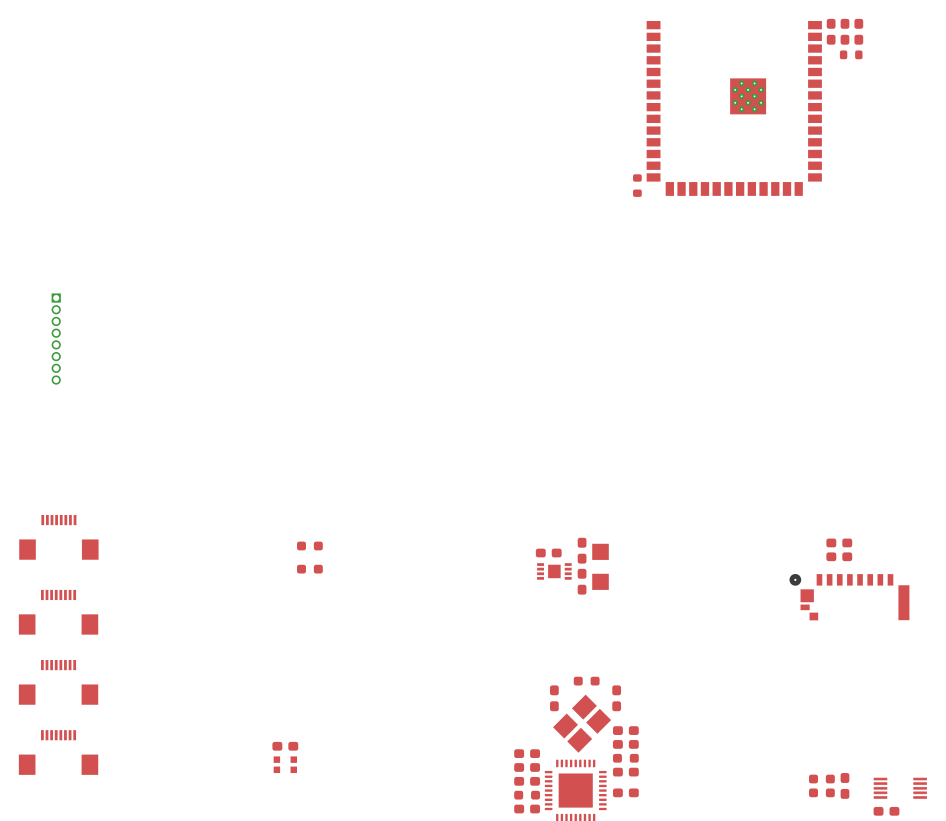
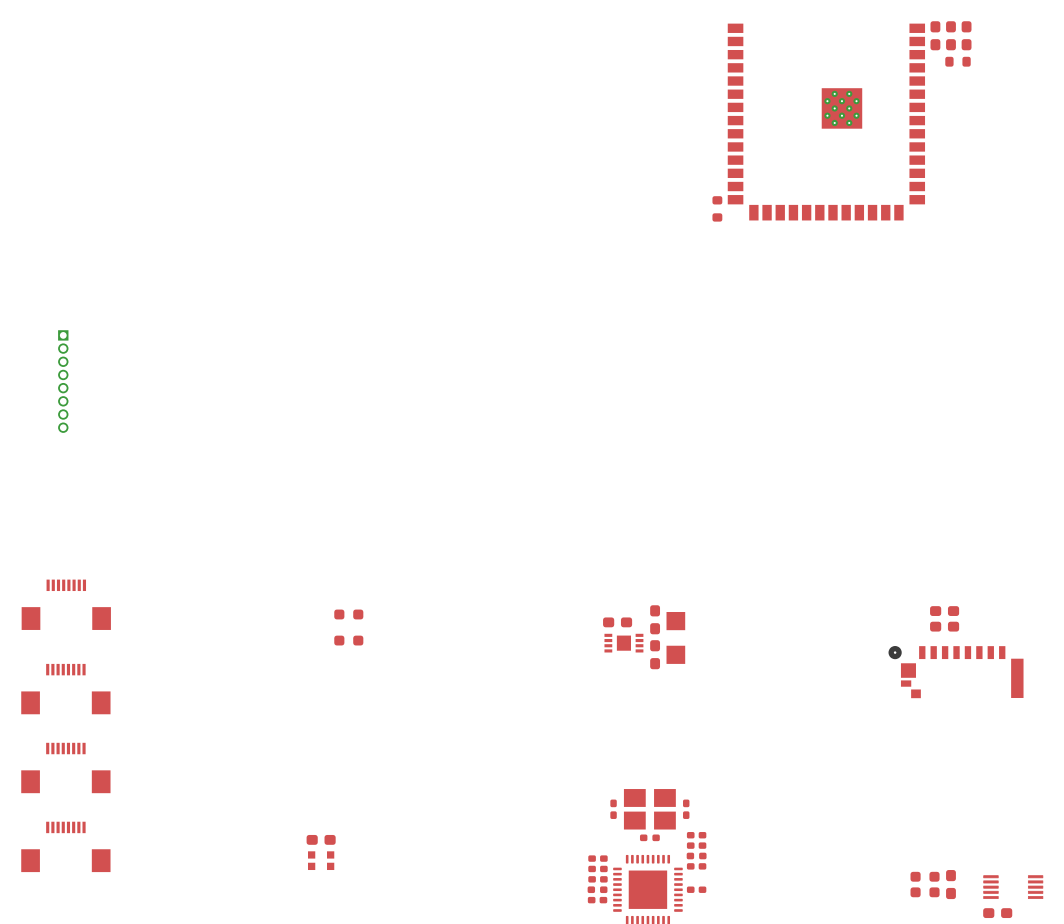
part: (586, 681) -> none
part: (554, 698) -> none
part: (616, 698) -> none
part: none -> (613, 809)
part: none -> (686, 809)
part rotation: 0° (582, 723) -> 45° clockwise (649, 809)
part: (625, 730) -> none
part: none -> (696, 835)
part: none -> (649, 837)
part: (625, 744) -> none
part: none -> (696, 845)
part: (527, 753) -> none
part: (625, 758) -> none
part: none -> (696, 855)
part: none -> (597, 858)
part: (527, 767) -> none
part: none -> (696, 866)
part: none -> (597, 868)
part: (625, 772) -> none
part footprint: [514, 776, 541, 786] -> [588, 876, 608, 883]
part footprint: [612, 788, 639, 798] -> [686, 886, 707, 893]
part: none -> (597, 889)
part: (527, 795) -> none
part: none -> (597, 900)
part: (527, 809) -> none

